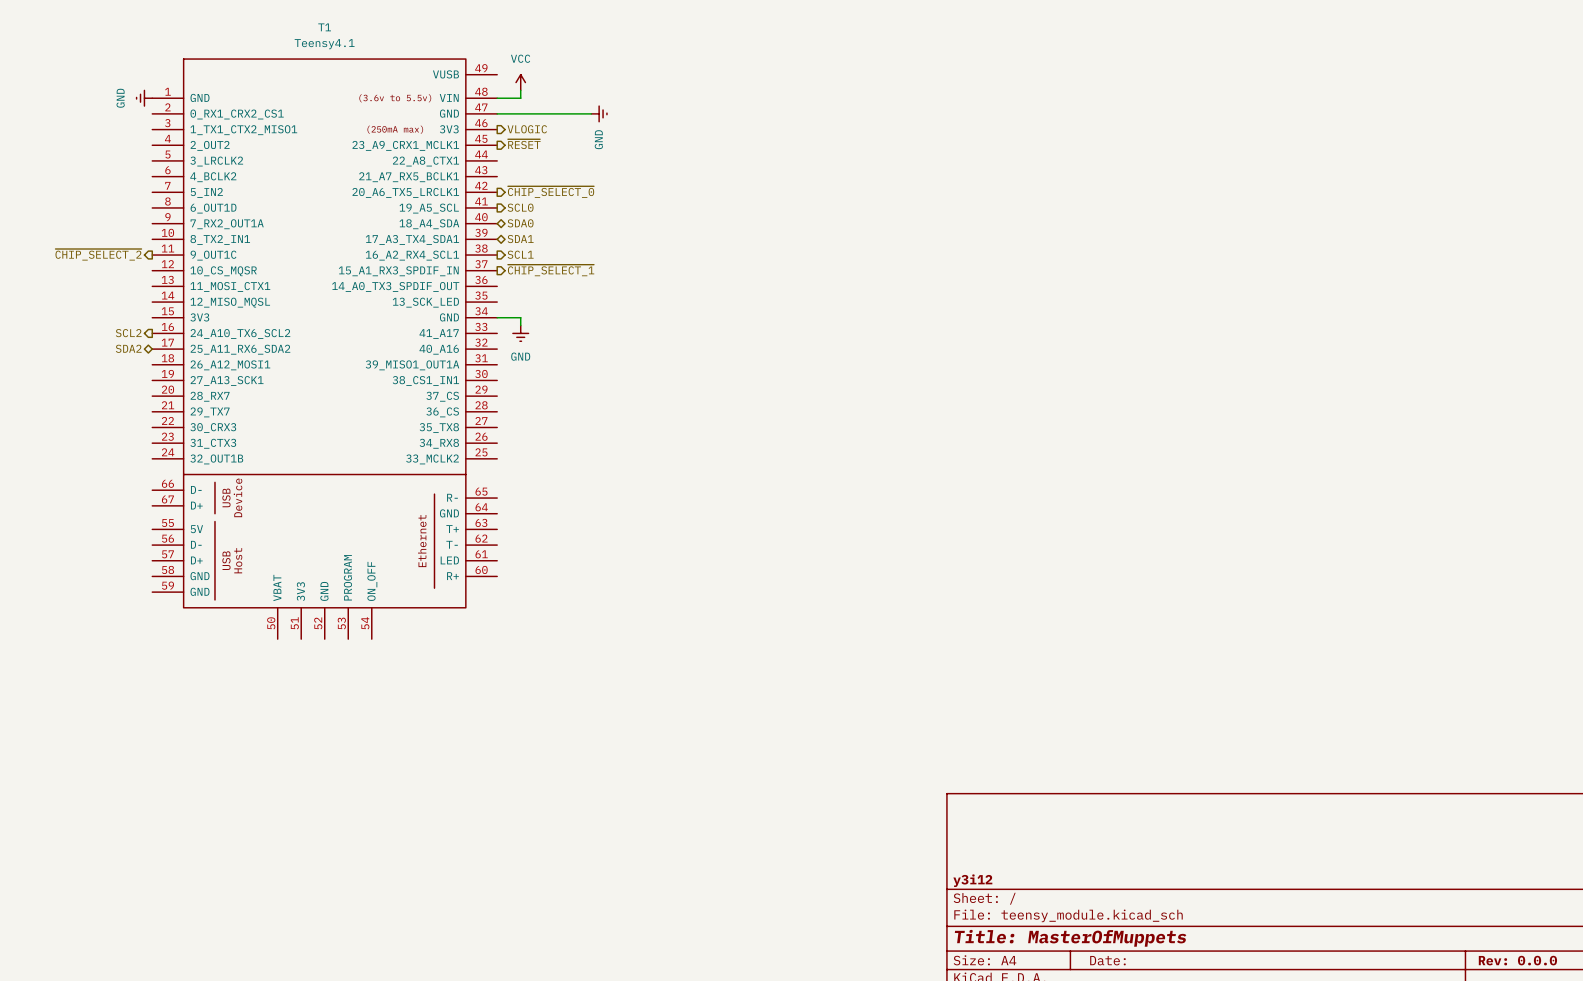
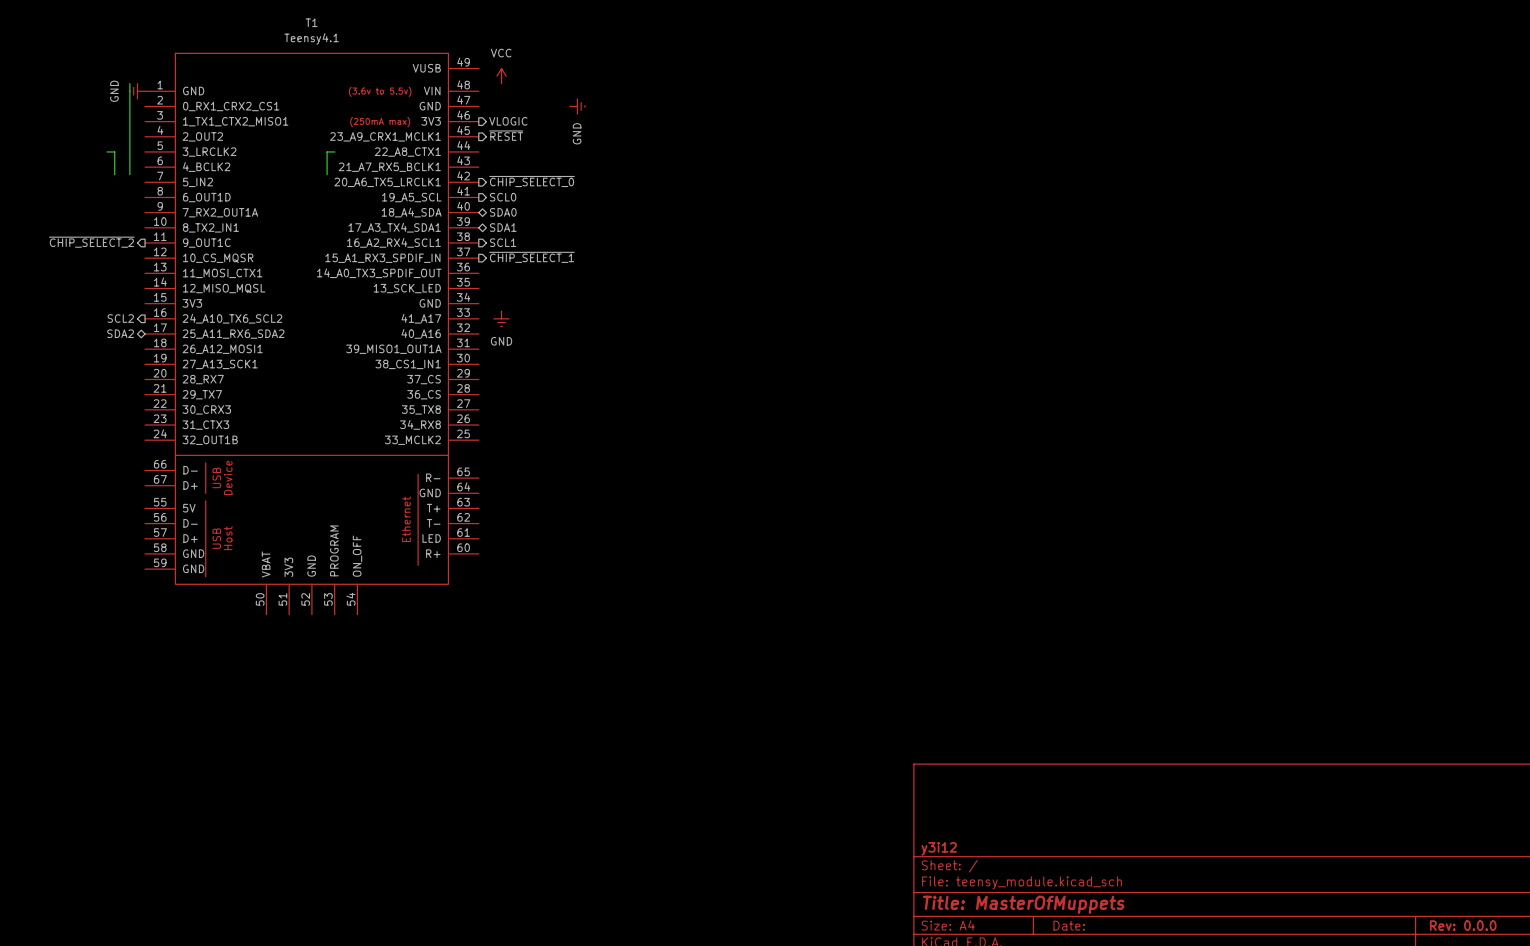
wire: none -> (129, 83) (129, 174)
wire: (520, 90) (520, 98) (497, 98) -> none
wire: (497, 113) (591, 113) -> none
wire: none -> (107, 151) (114, 151) (114, 174)
wire: none -> (334, 151) (327, 151) (327, 174)
wire: (497, 317) (520, 317) (520, 325) -> none

